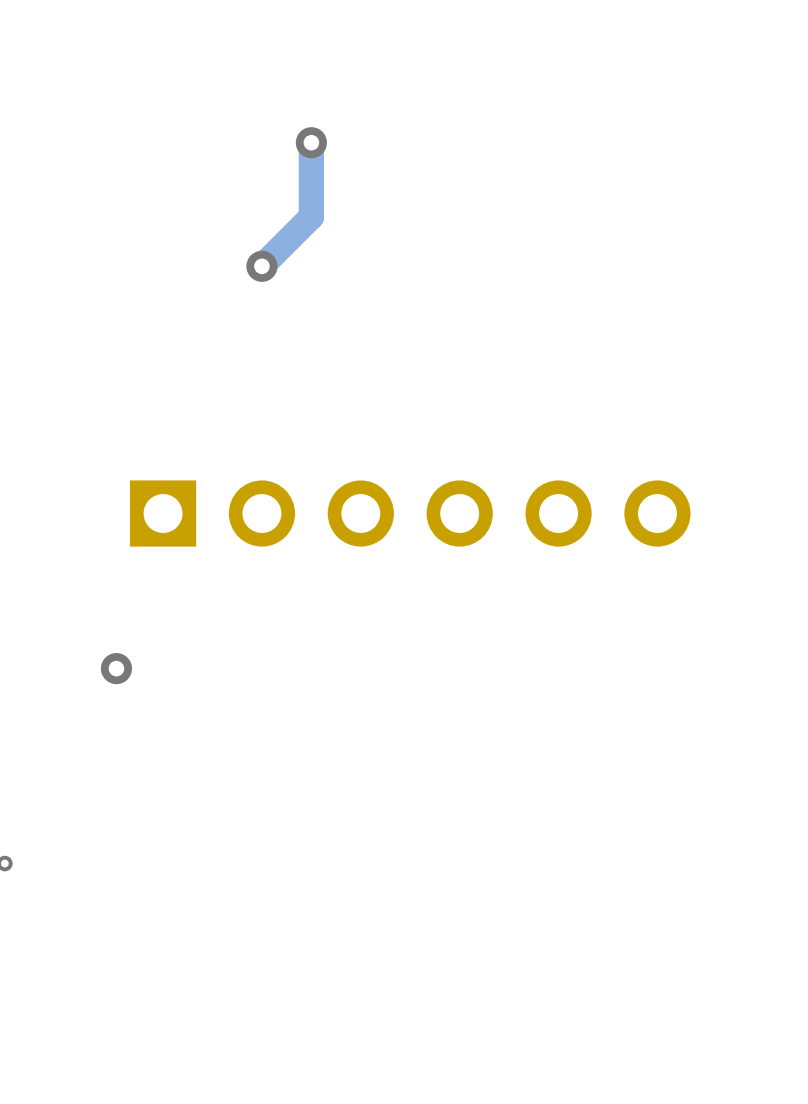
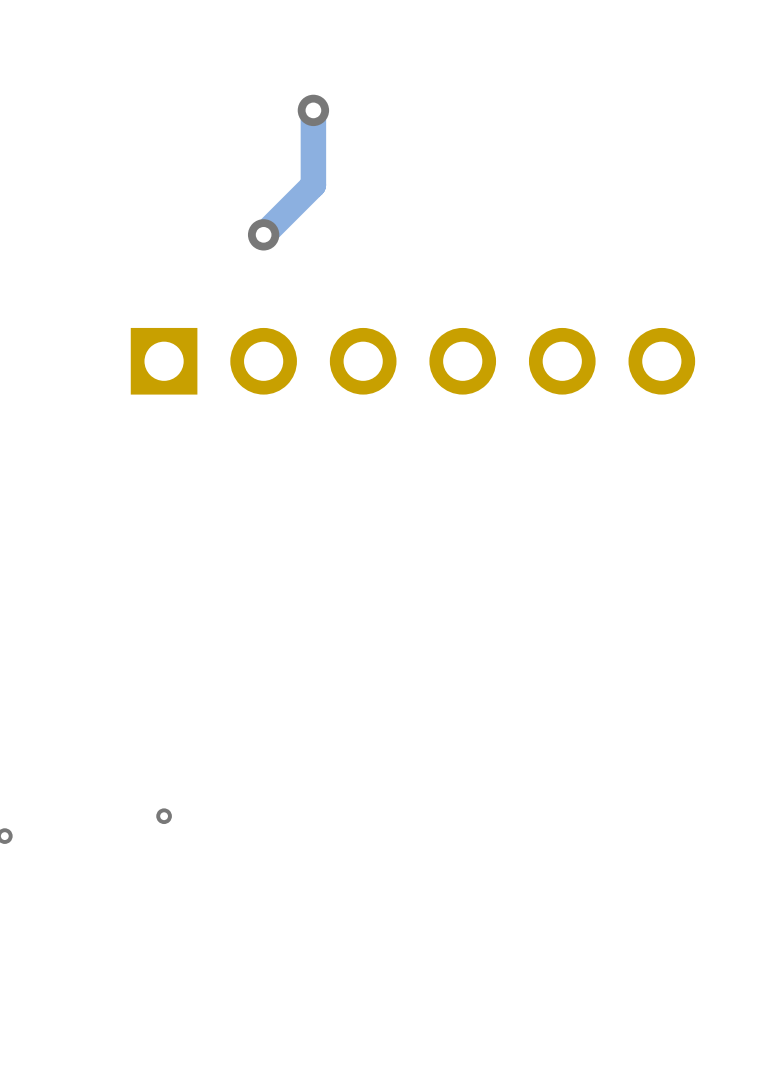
part position: (410, 513) -> (412, 361)
via: (116, 668) -> none
via: none -> (164, 816)

